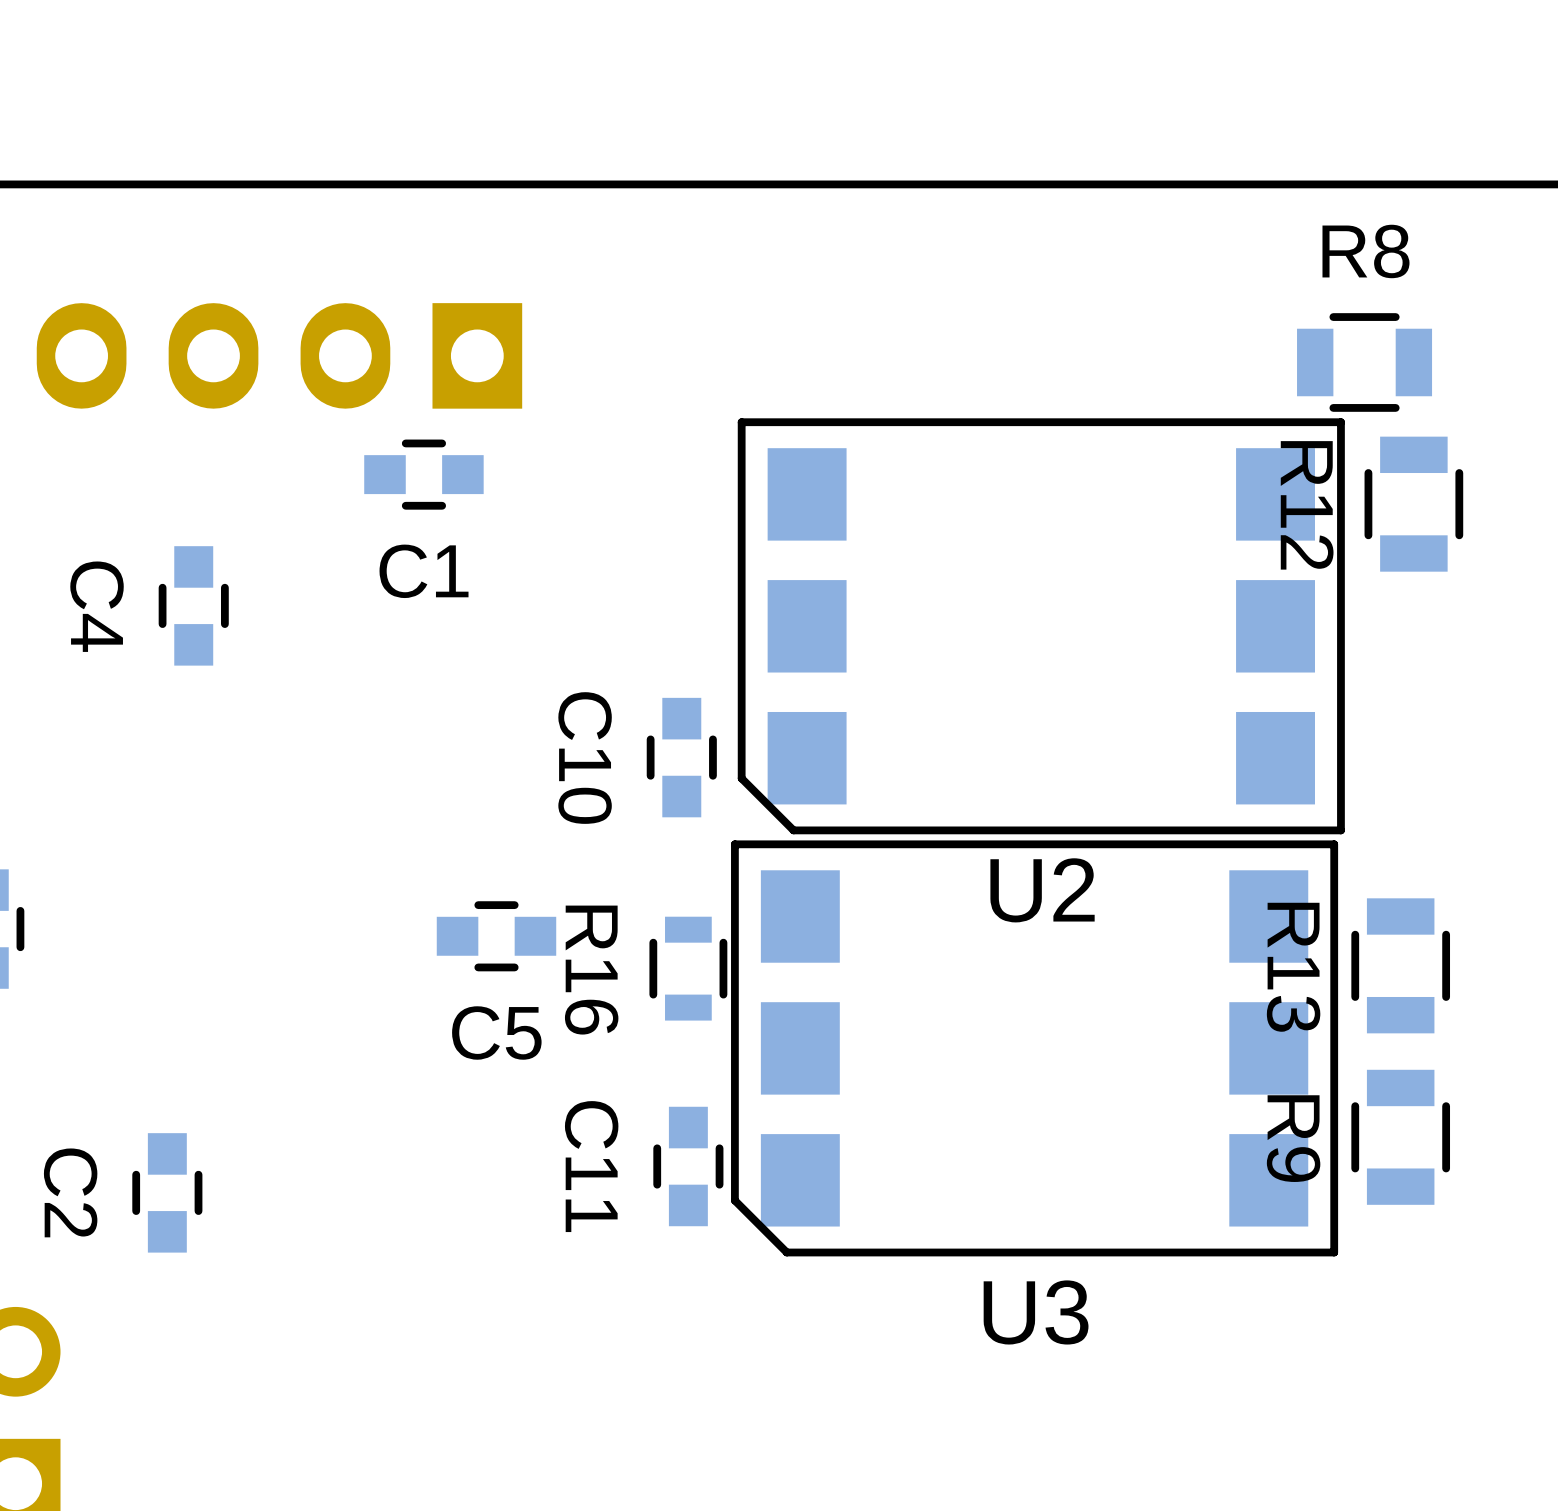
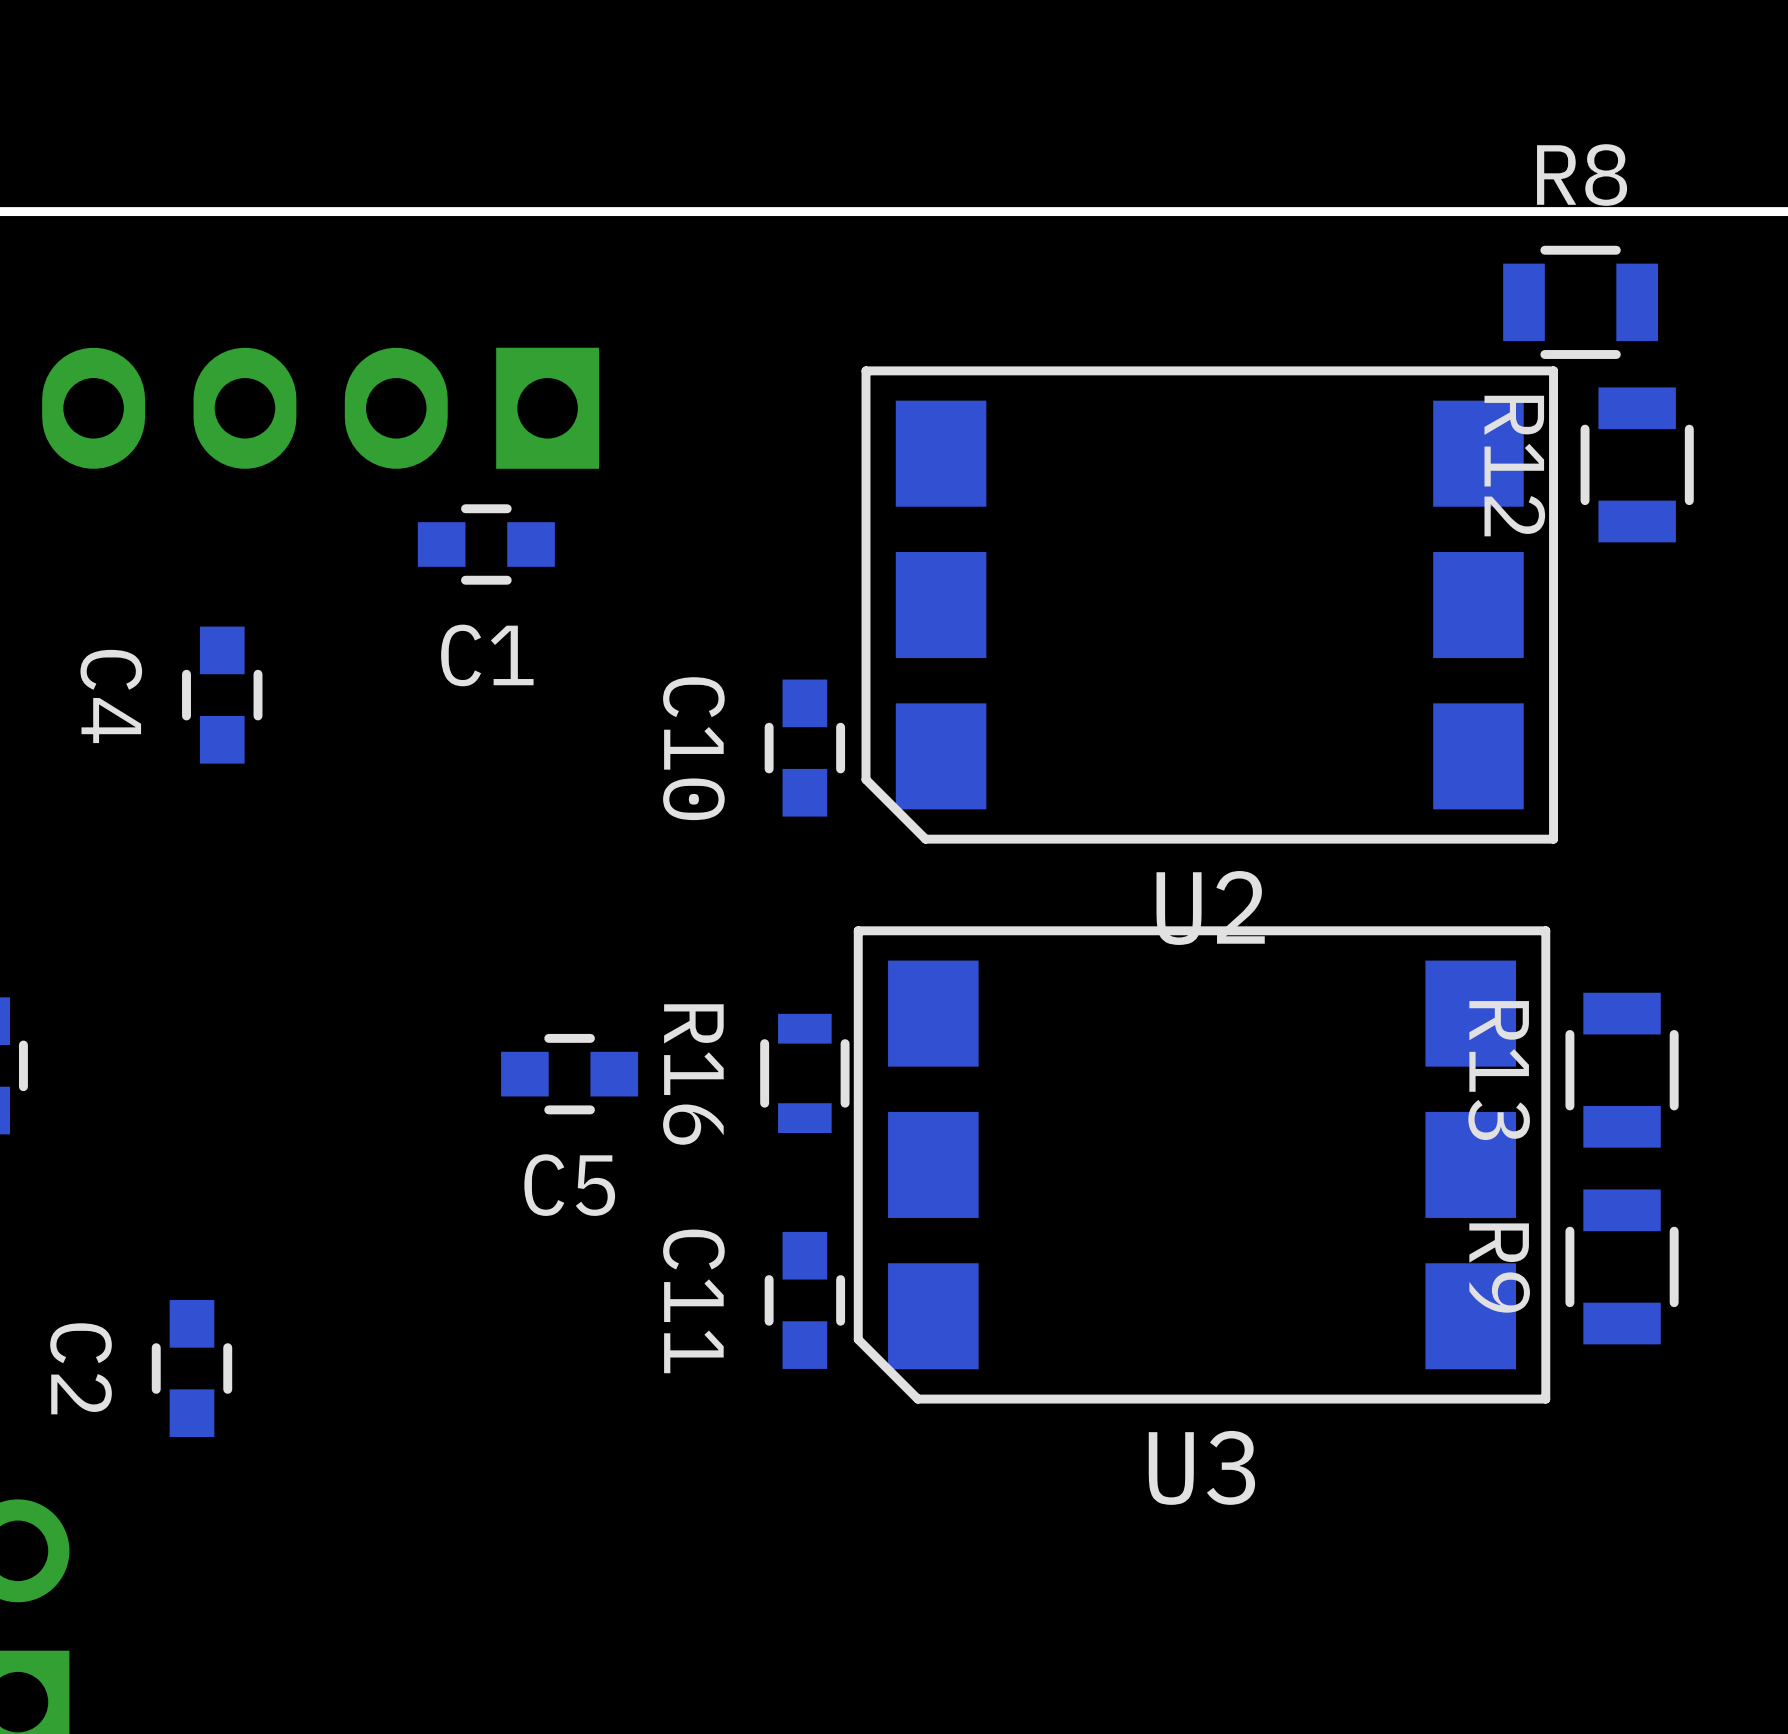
R8 position: (1364, 362) -> (1580, 302)
R12 position: (1413, 504) -> (1637, 464)
U2 position: (1041, 626) -> (1209, 605)
C10 position: (681, 757) -> (804, 748)
R13 position: (1400, 965) -> (1622, 1070)
R16 position: (688, 968) -> (804, 1073)
U3 position: (1034, 1048) -> (1202, 1164)
R9 position: (1400, 1137) -> (1622, 1266)
C11 position: (688, 1166) -> (804, 1300)

